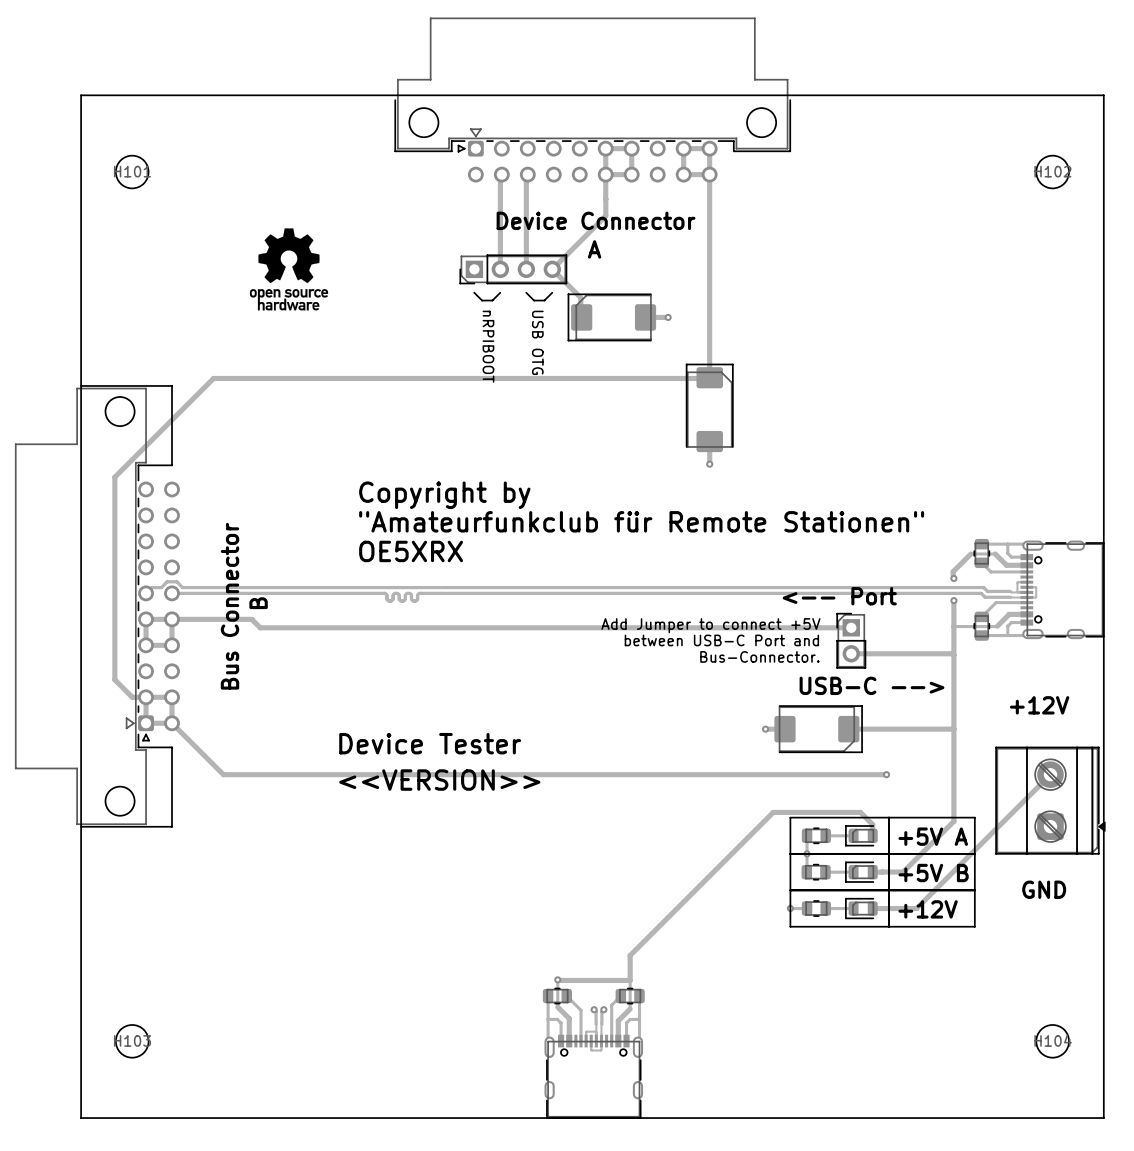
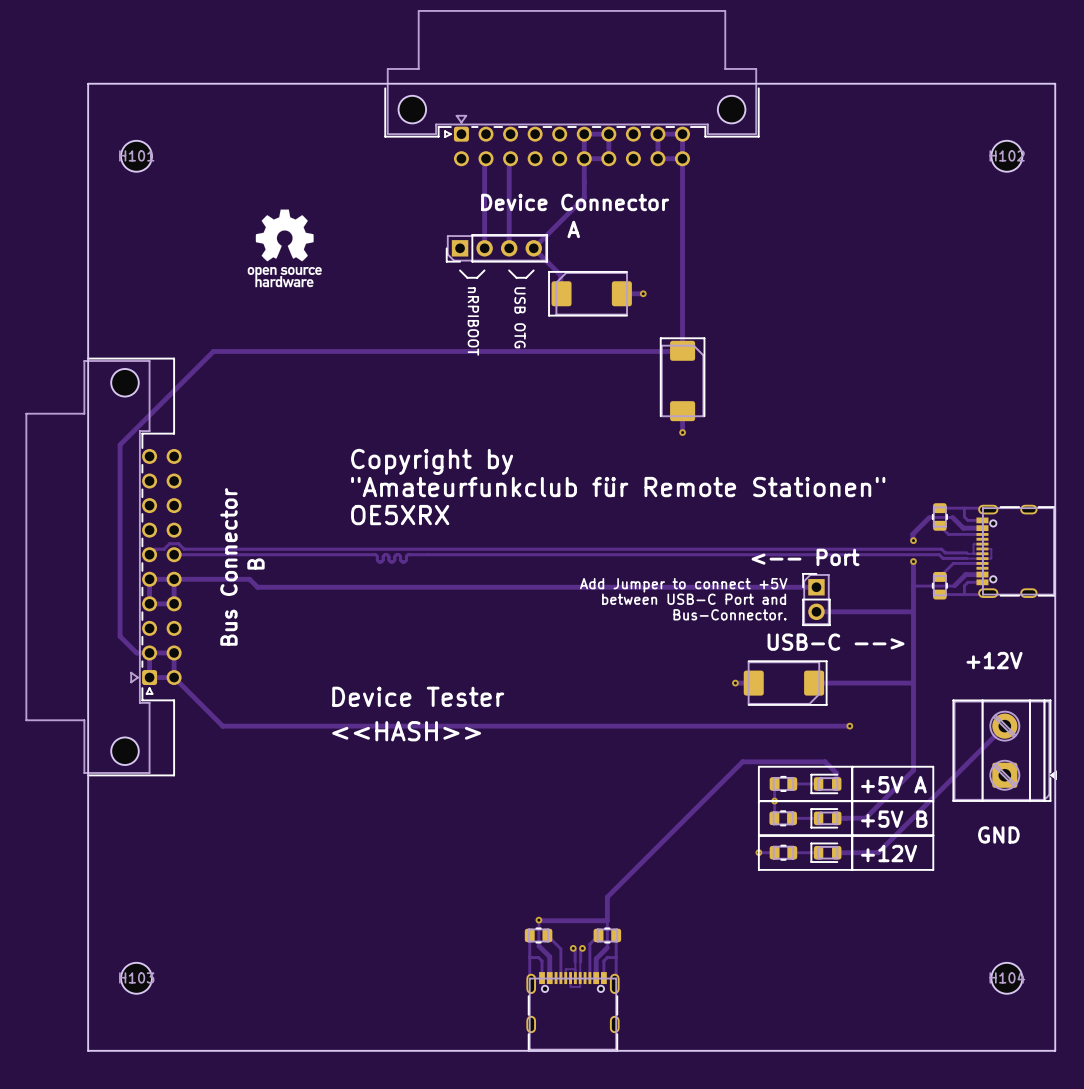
text: <<VERSION>> (439, 780) -> <<HASH>> (406, 731)

